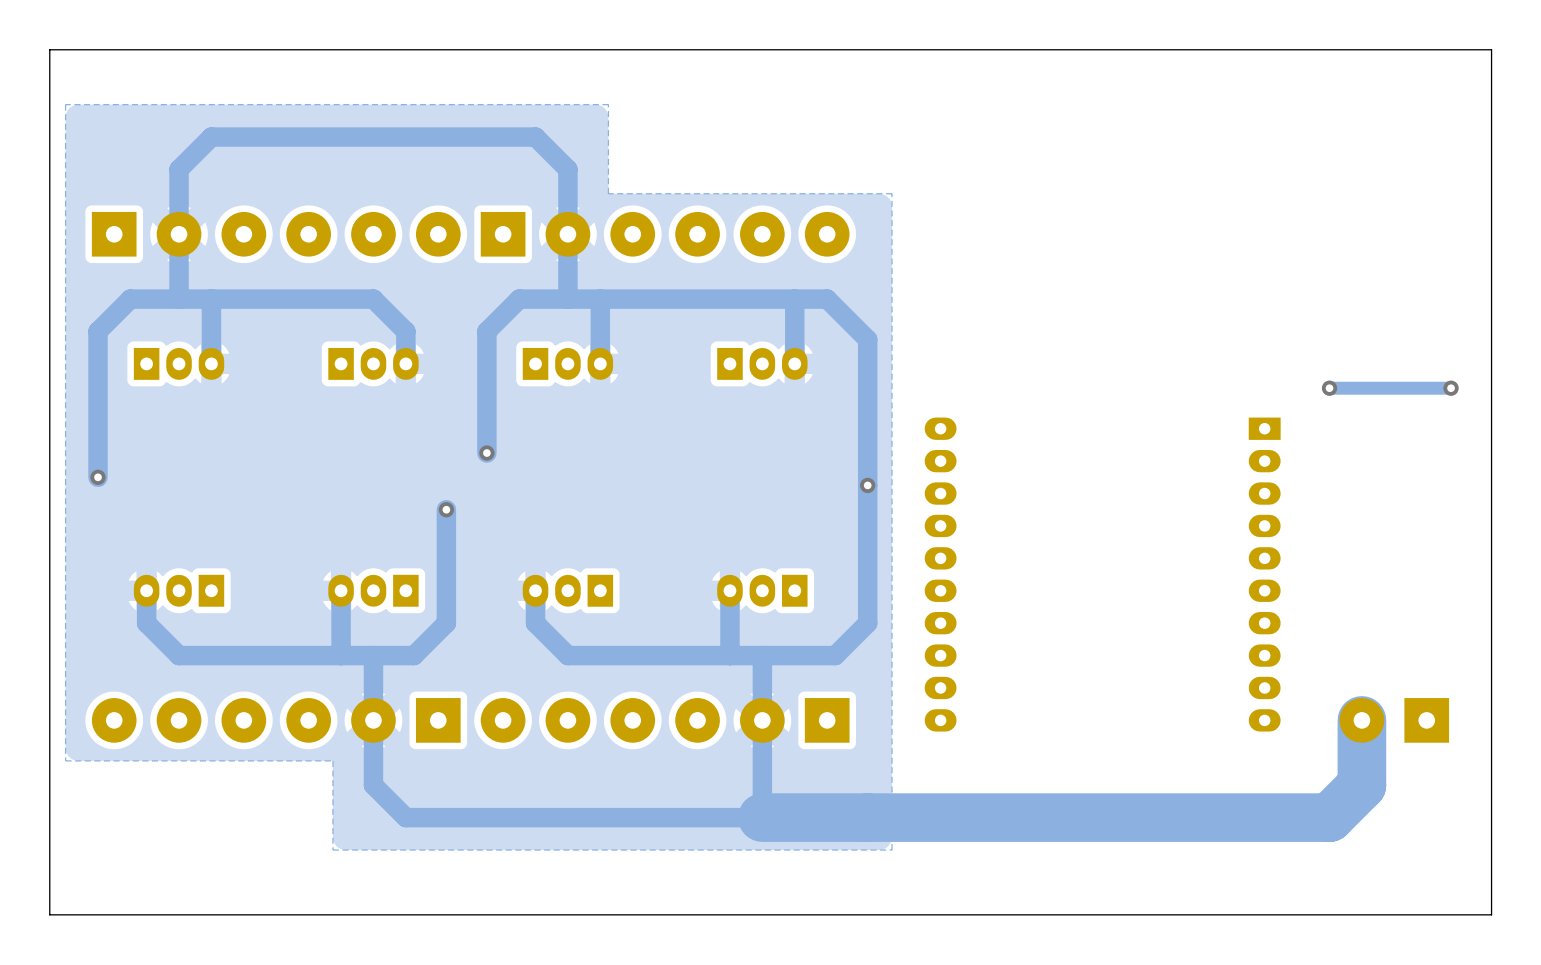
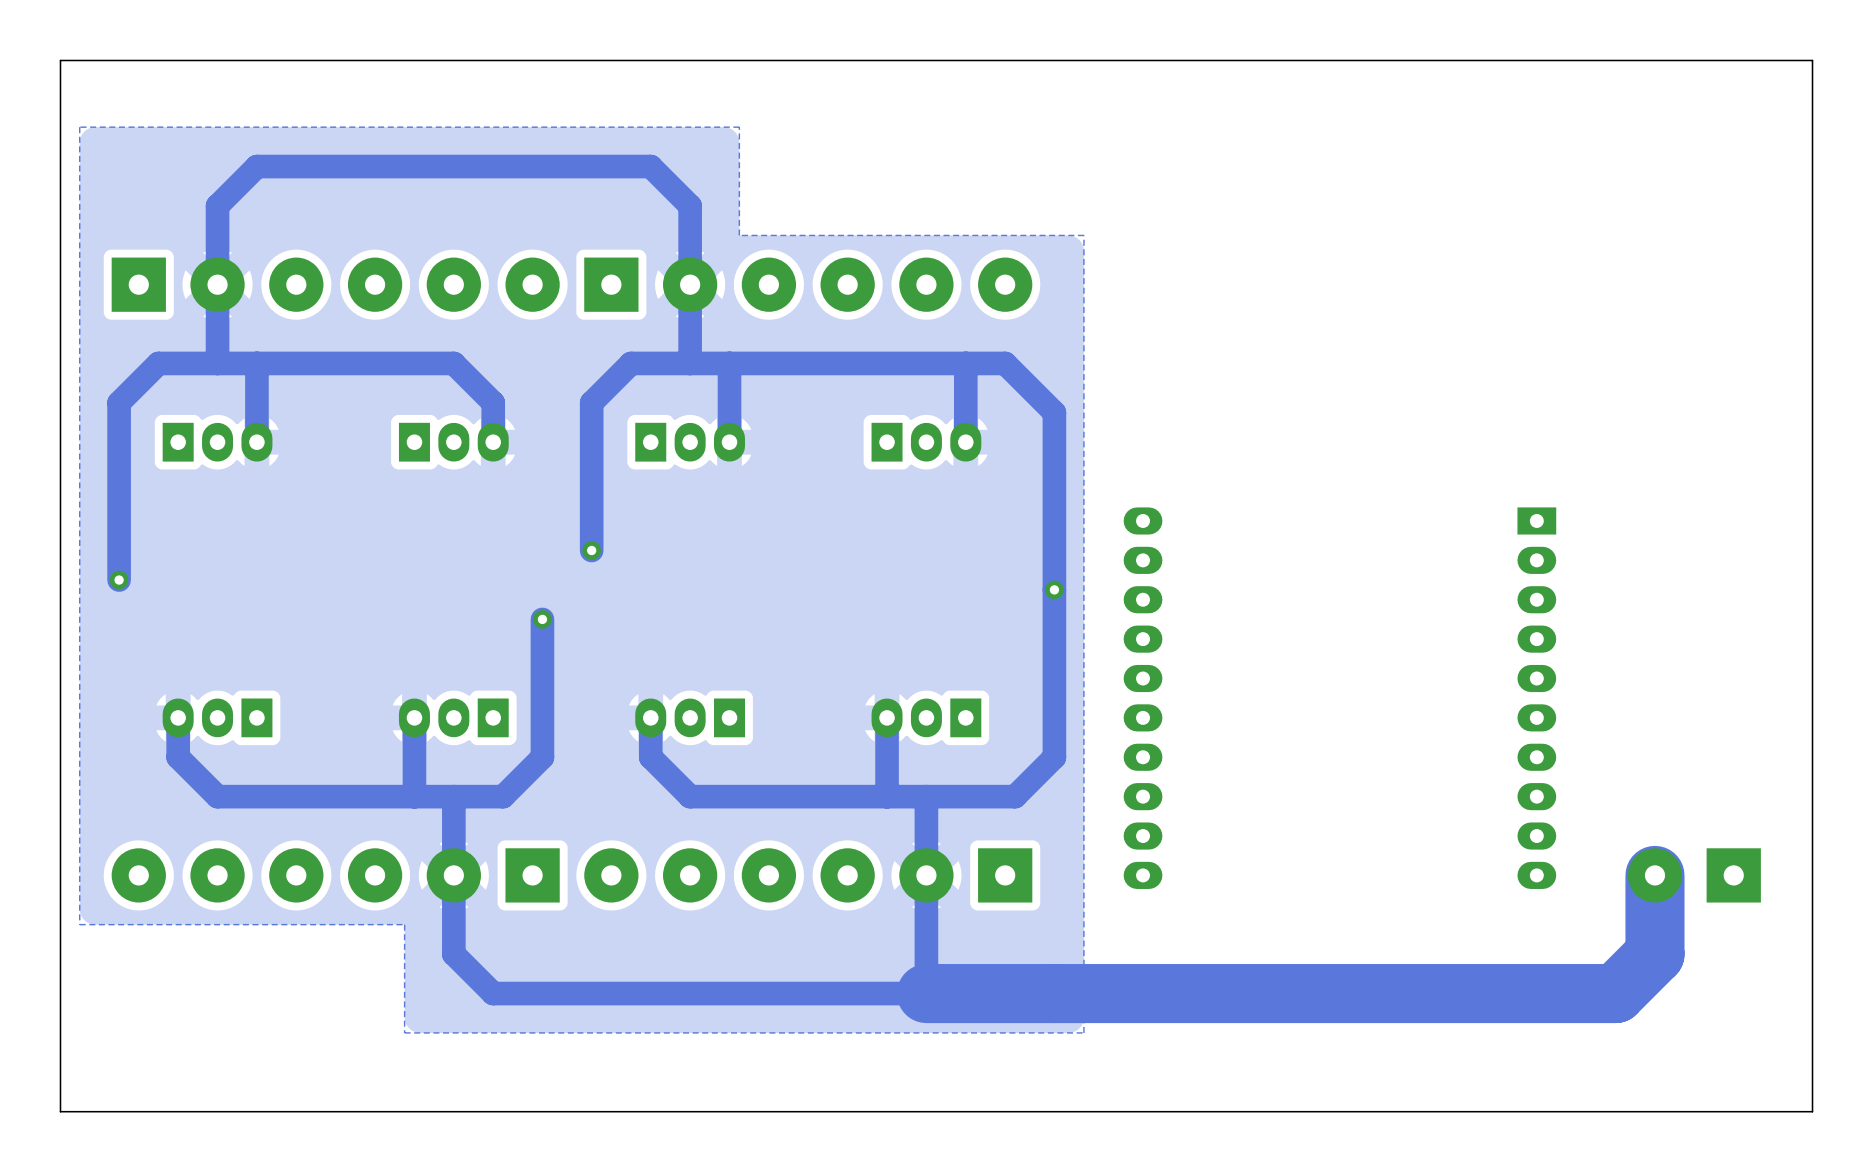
via: (1329, 388) -> none
track: (1451, 388) (1329, 388) -> none
via: (1451, 388) -> none

